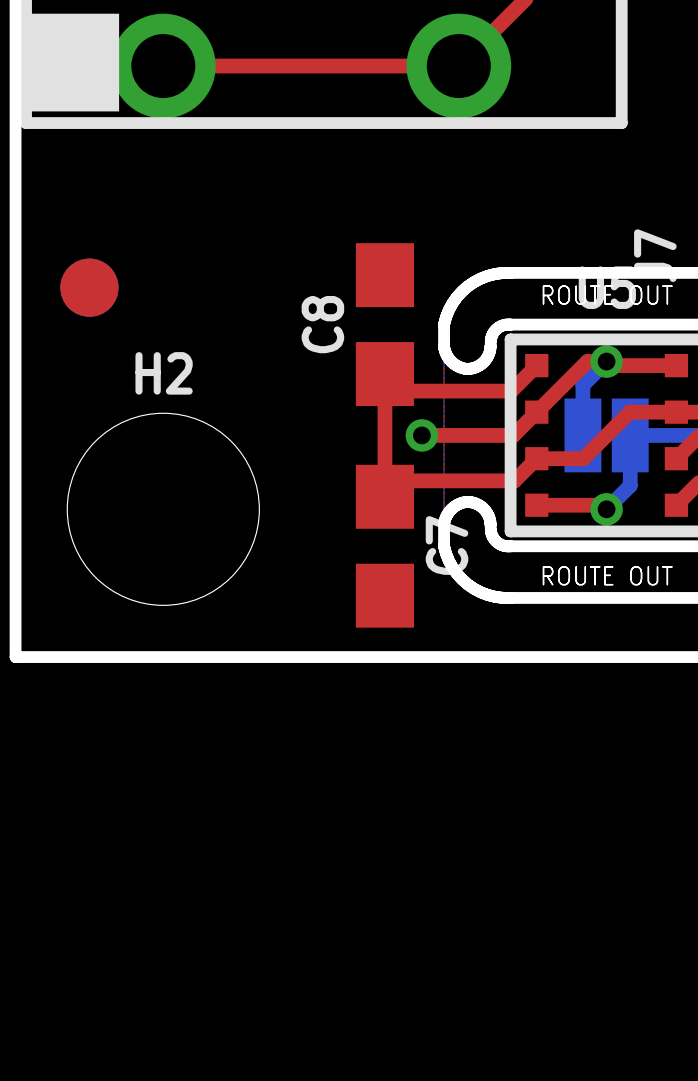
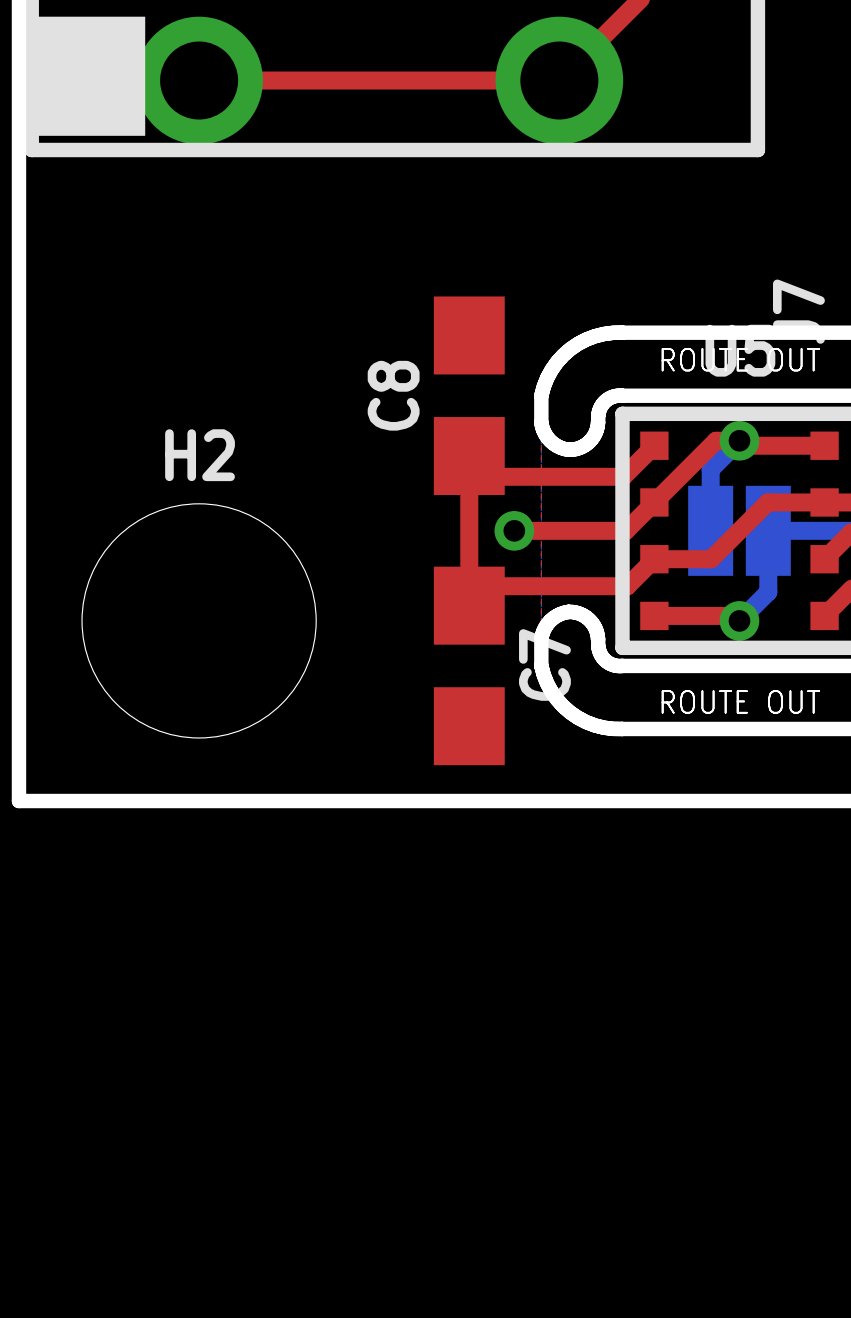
part: (89, 287) -> none

